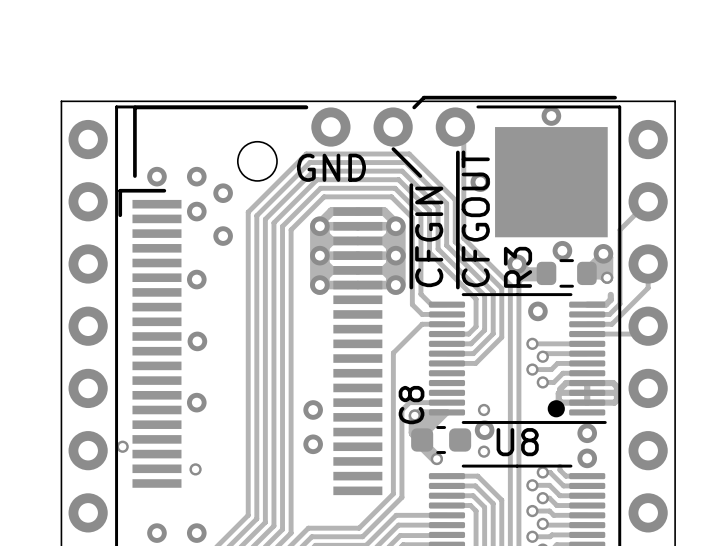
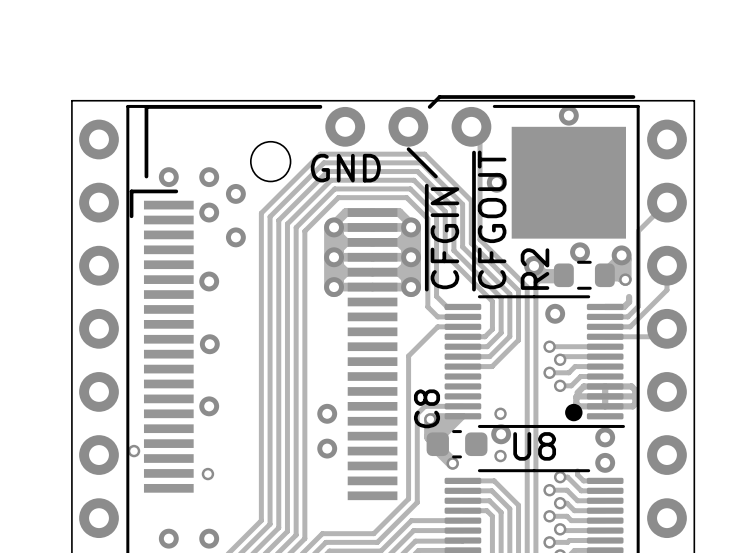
R3 name: R3 (518, 267) -> R2 (534, 269)

